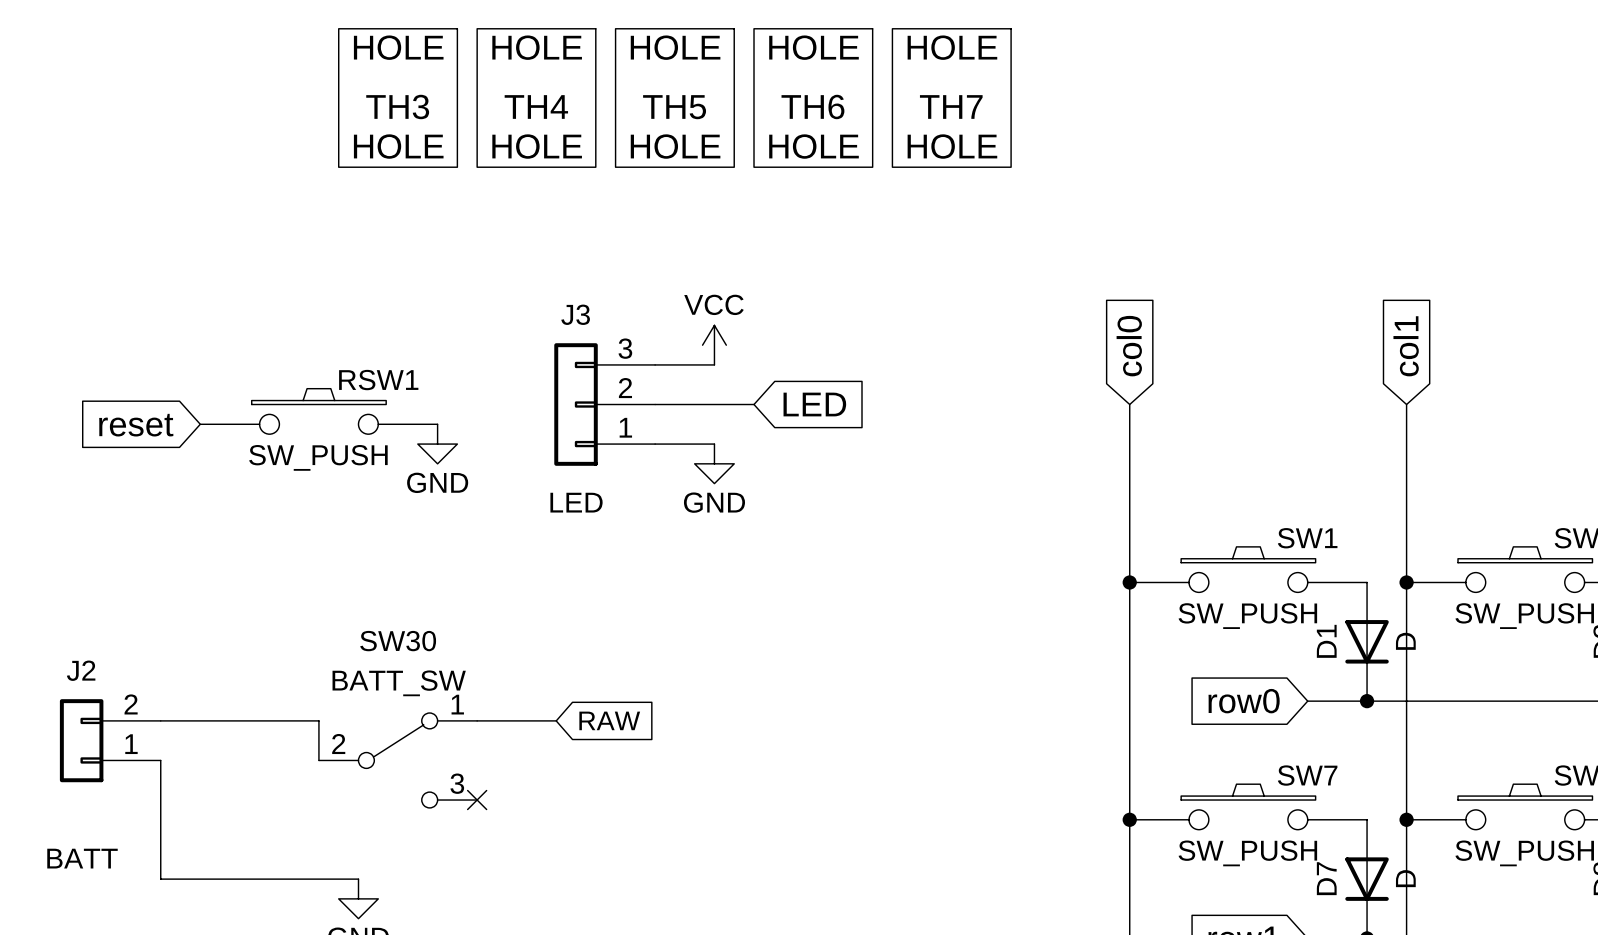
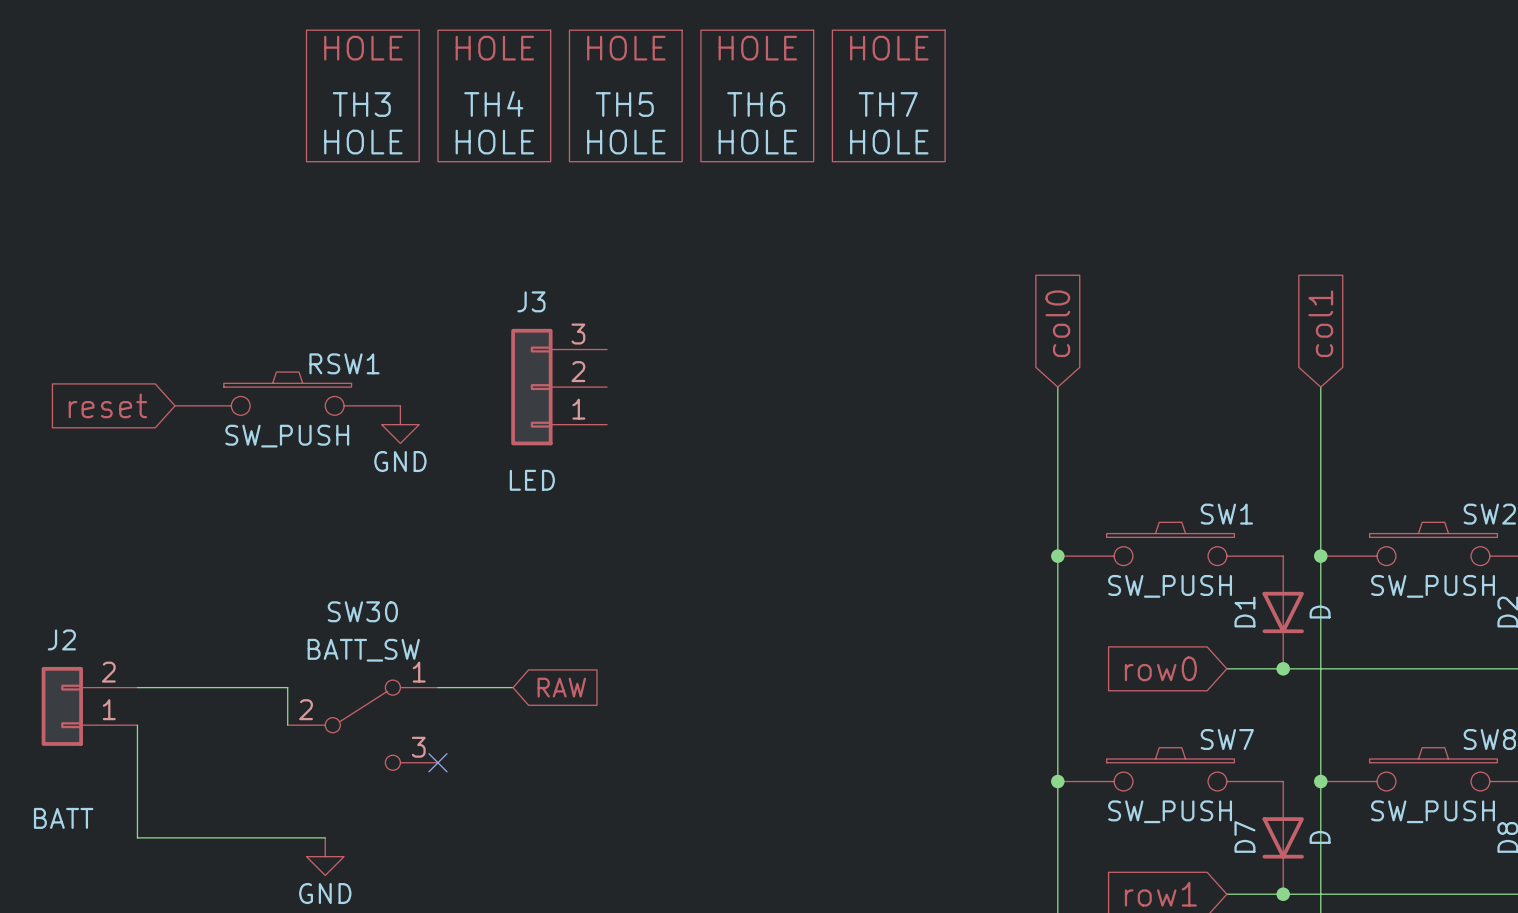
power symbol: VCC (714, 345) -> none
wire: (655, 364) (714, 364) -> none
wire: (655, 404) (754, 404) -> none
global label: LED (814, 404) -> none
wire: (655, 444) (714, 444) -> none
power symbol: GND (714, 463) -> none

